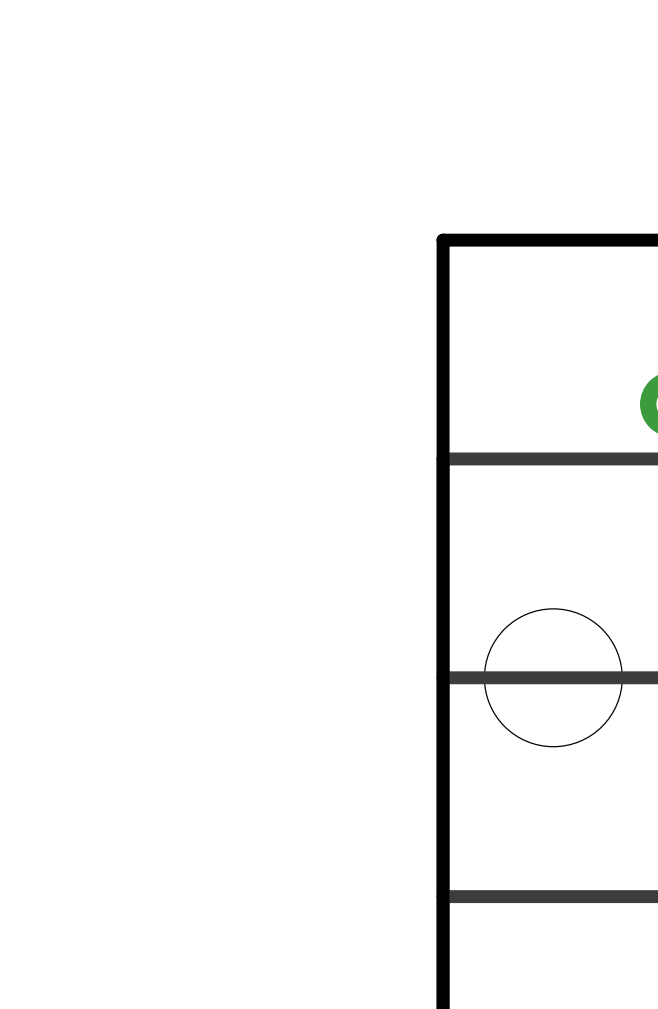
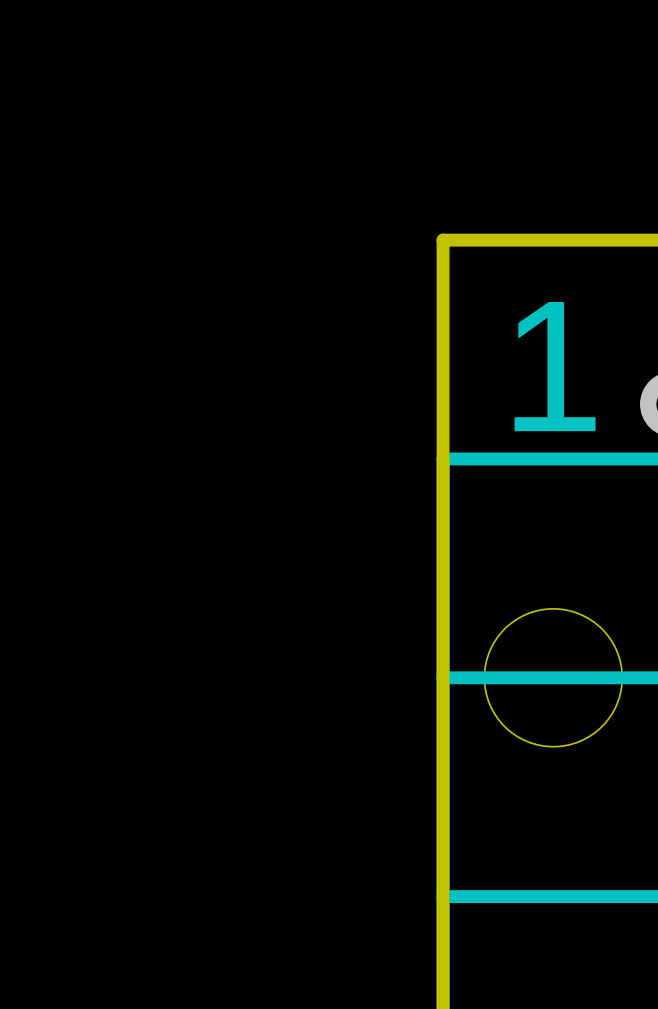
text: none -> 1 (555, 366)

